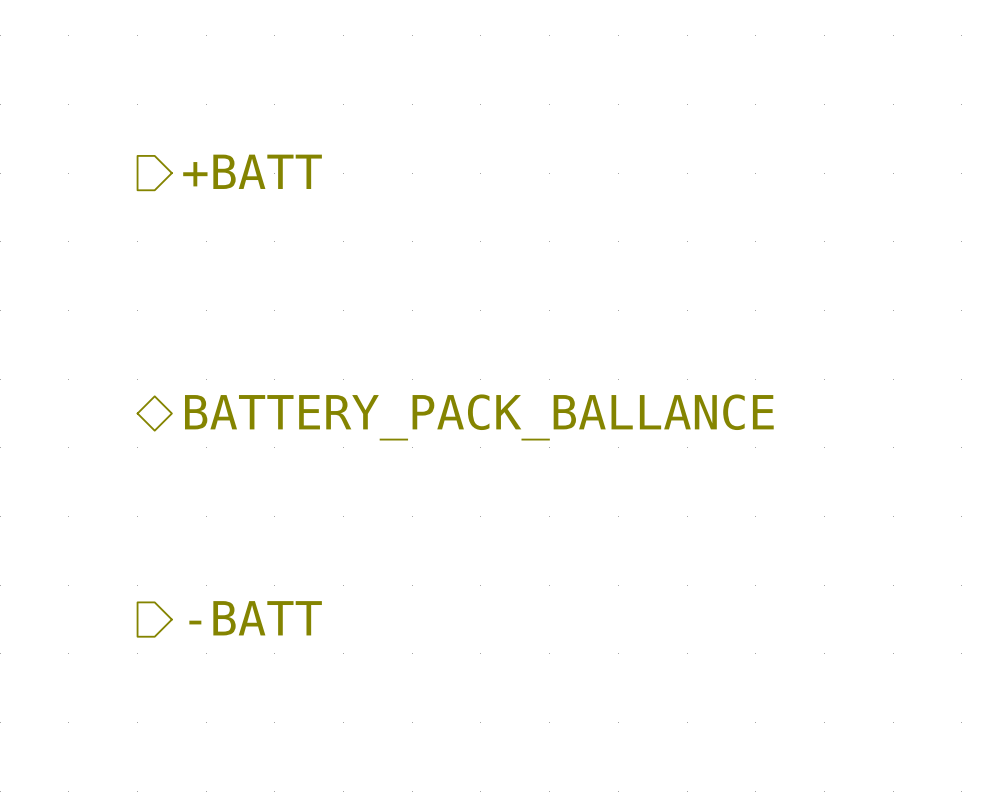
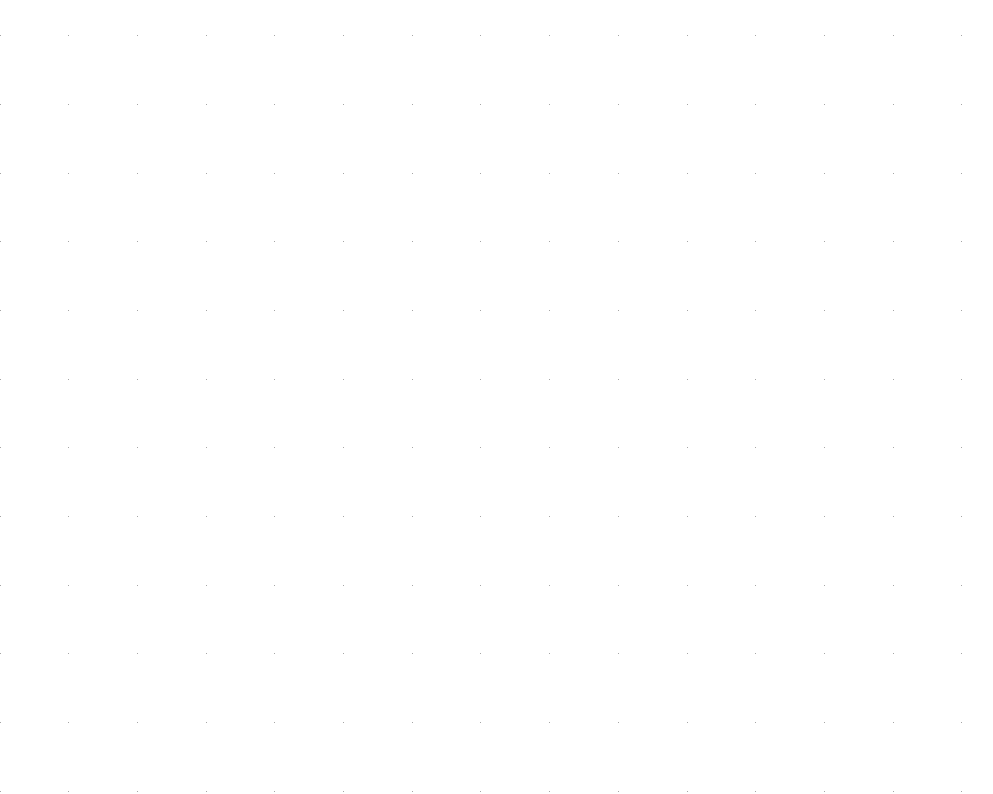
hierarchical label: +BATT (252, 171) -> none
hierarchical label: BATTERY_PACK_BALLANCE (479, 417) -> none
hierarchical label: -BATT (255, 618) -> none

